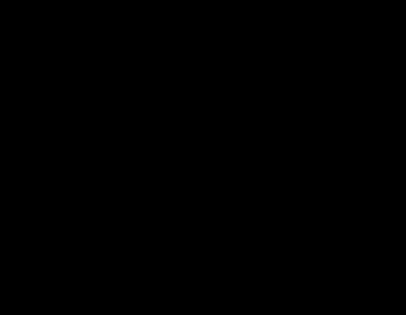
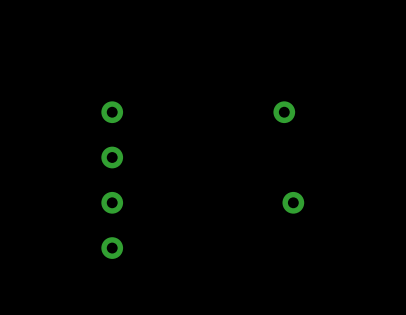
via: none -> (112, 112)
via: none -> (284, 112)
via: none -> (112, 157)
via: none -> (112, 202)
via: none -> (293, 202)
via: none -> (112, 248)

